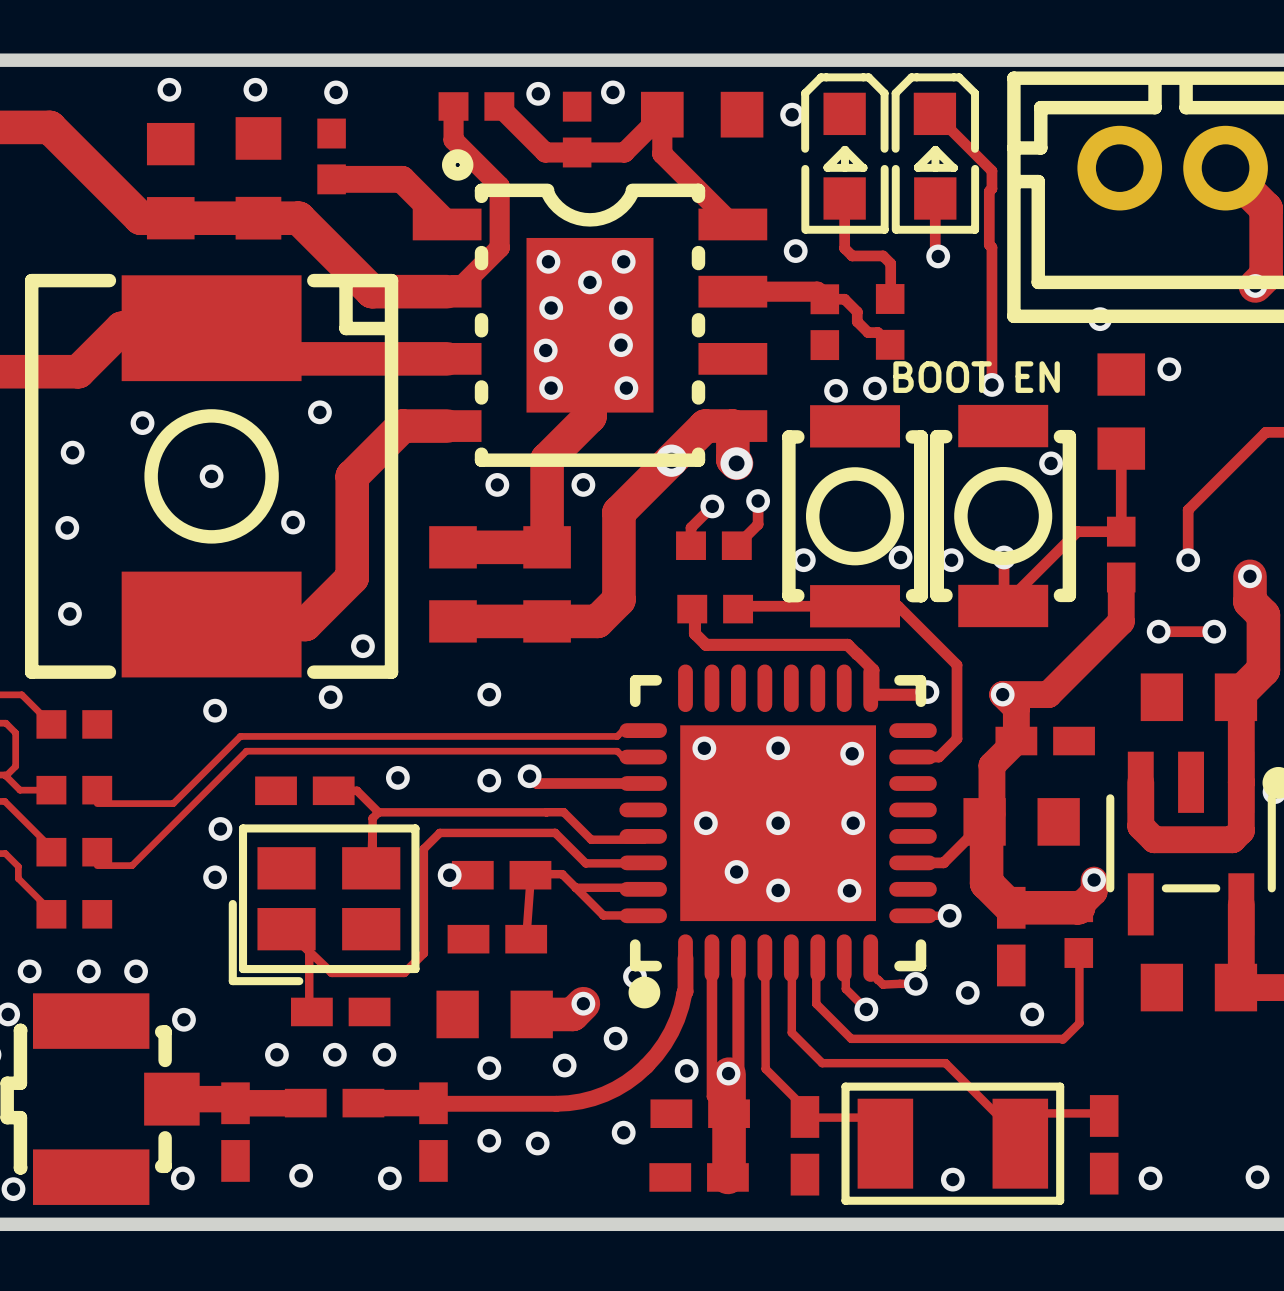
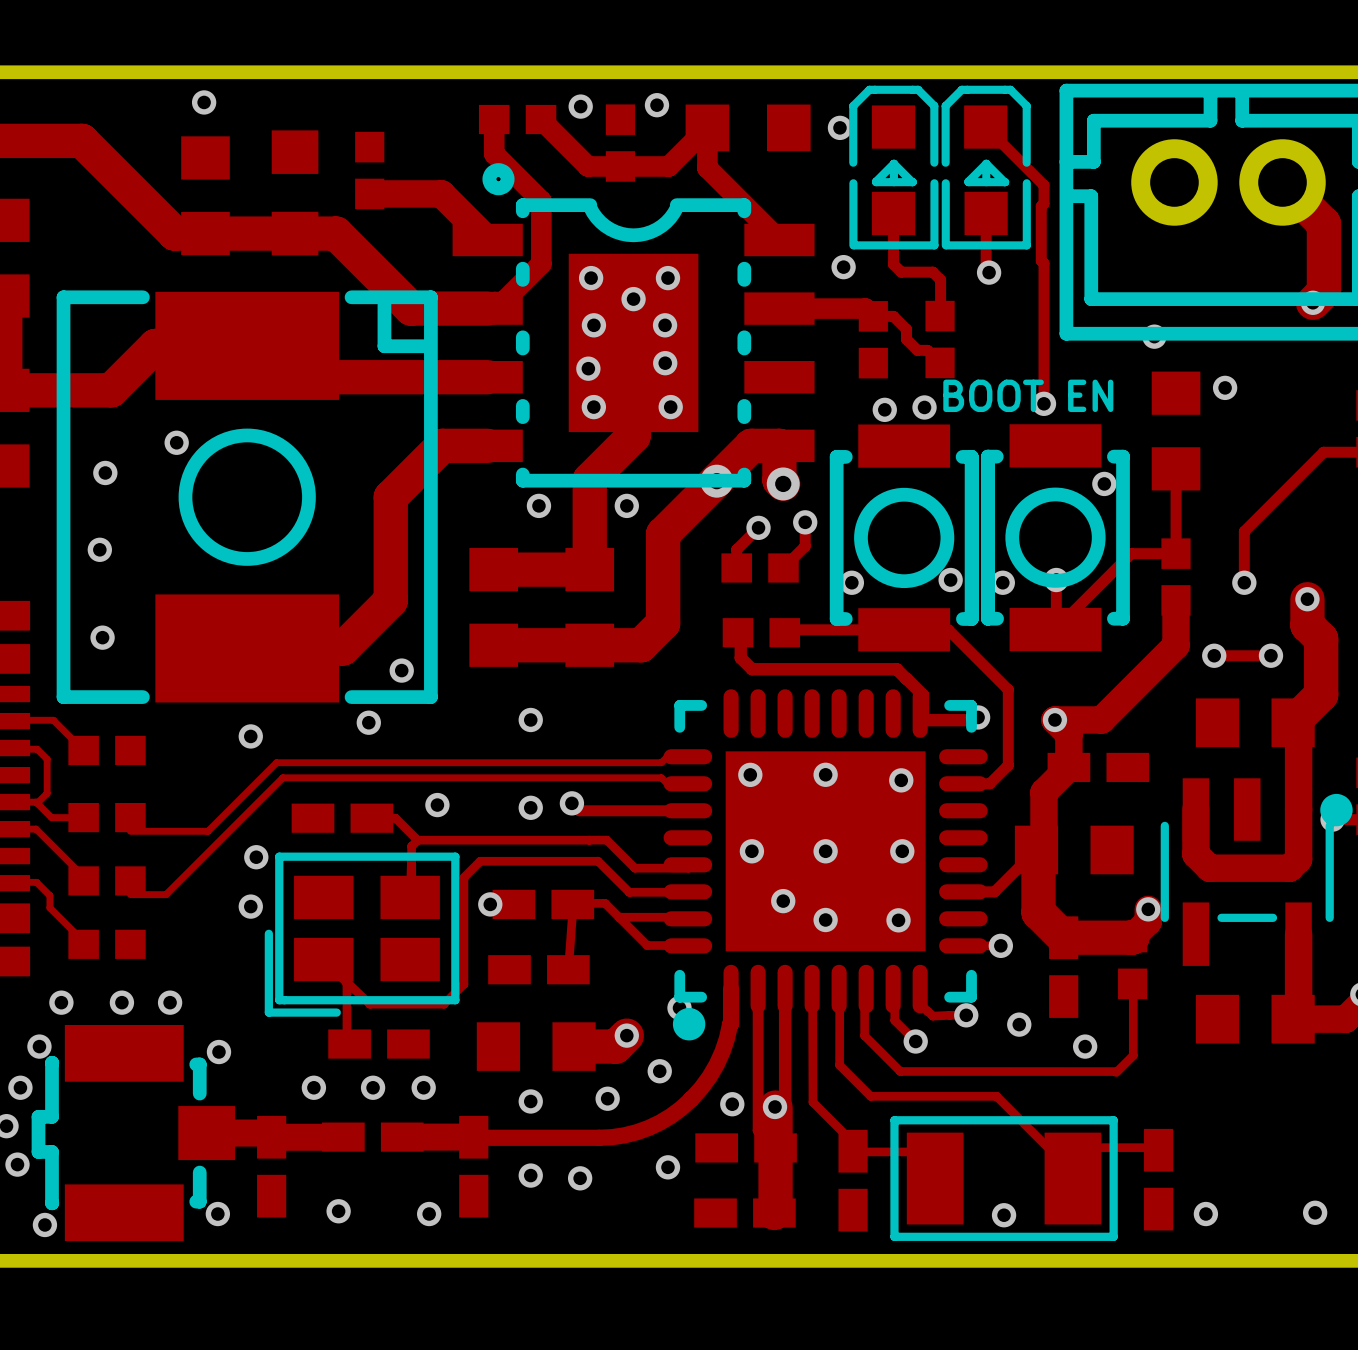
via: (255, 89) -> none
via: (336, 92) -> none
via: (319, 412) -> none
via: (211, 476) -> none
via: (293, 522) -> none

